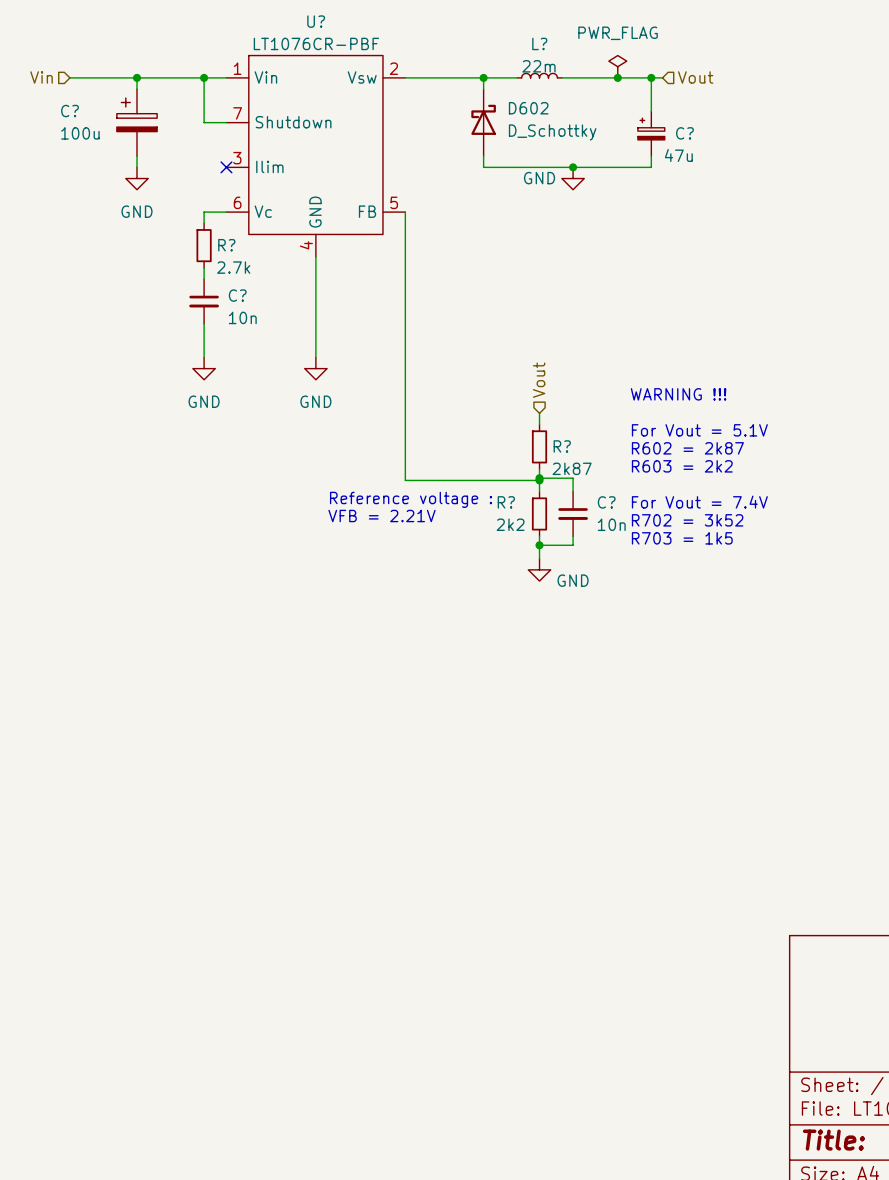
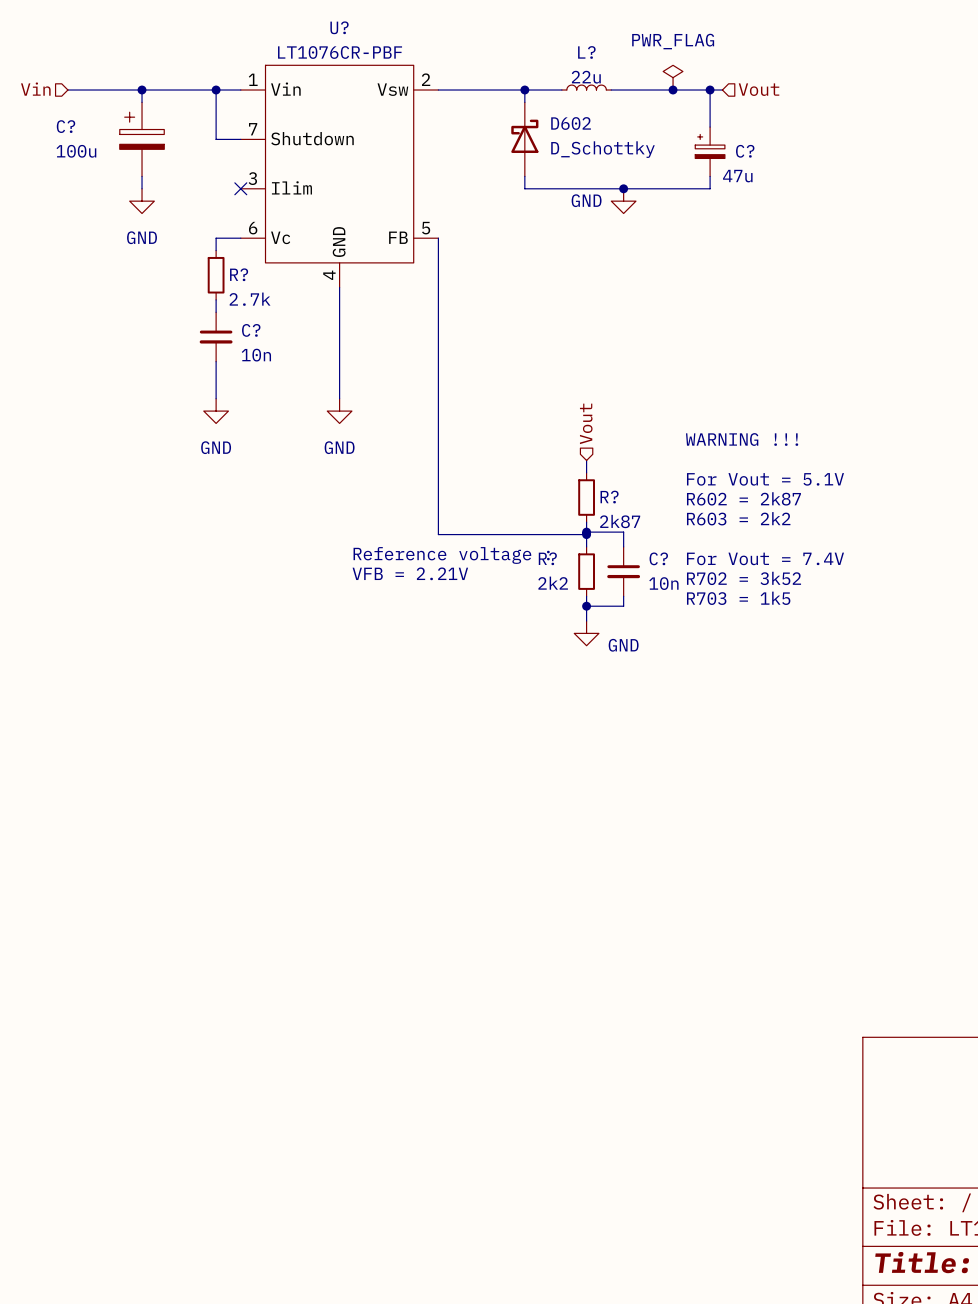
L? value: 22m (538, 66) -> 22u (586, 77)

